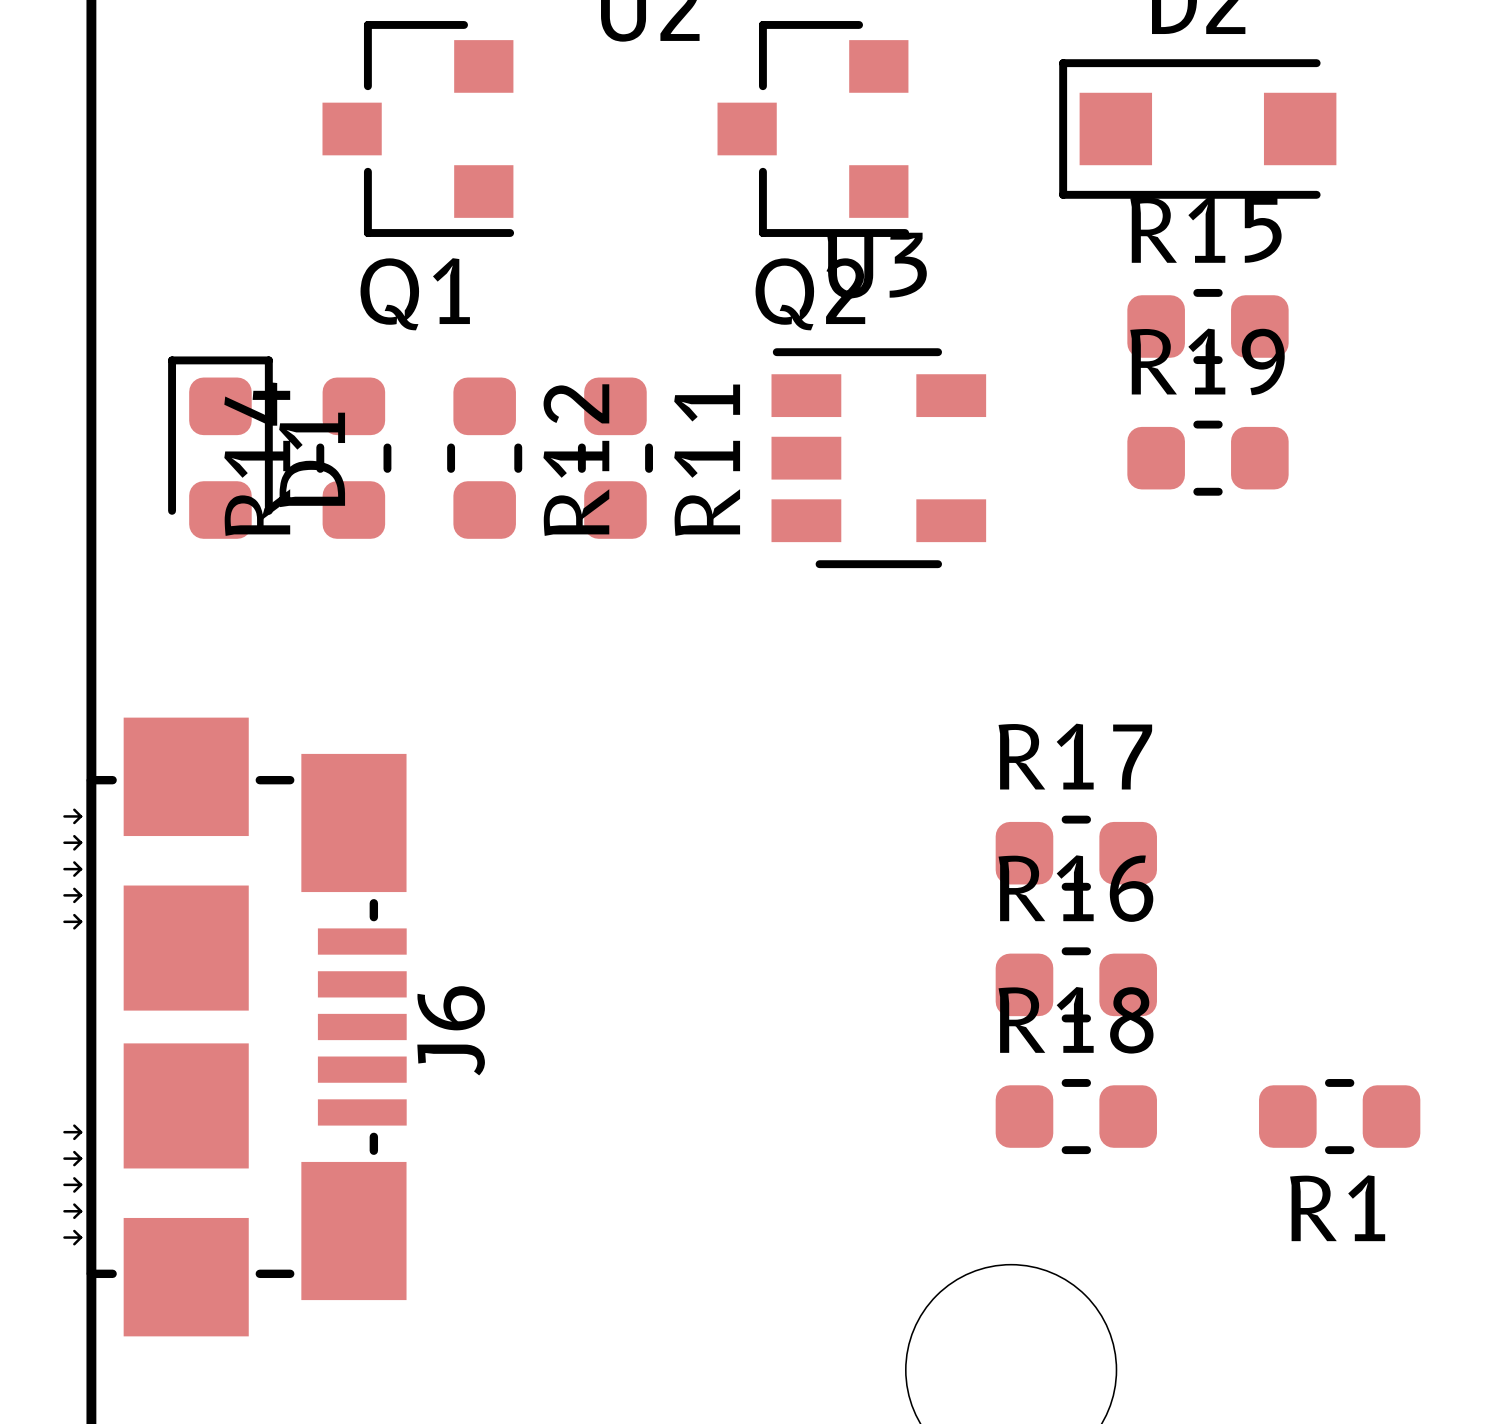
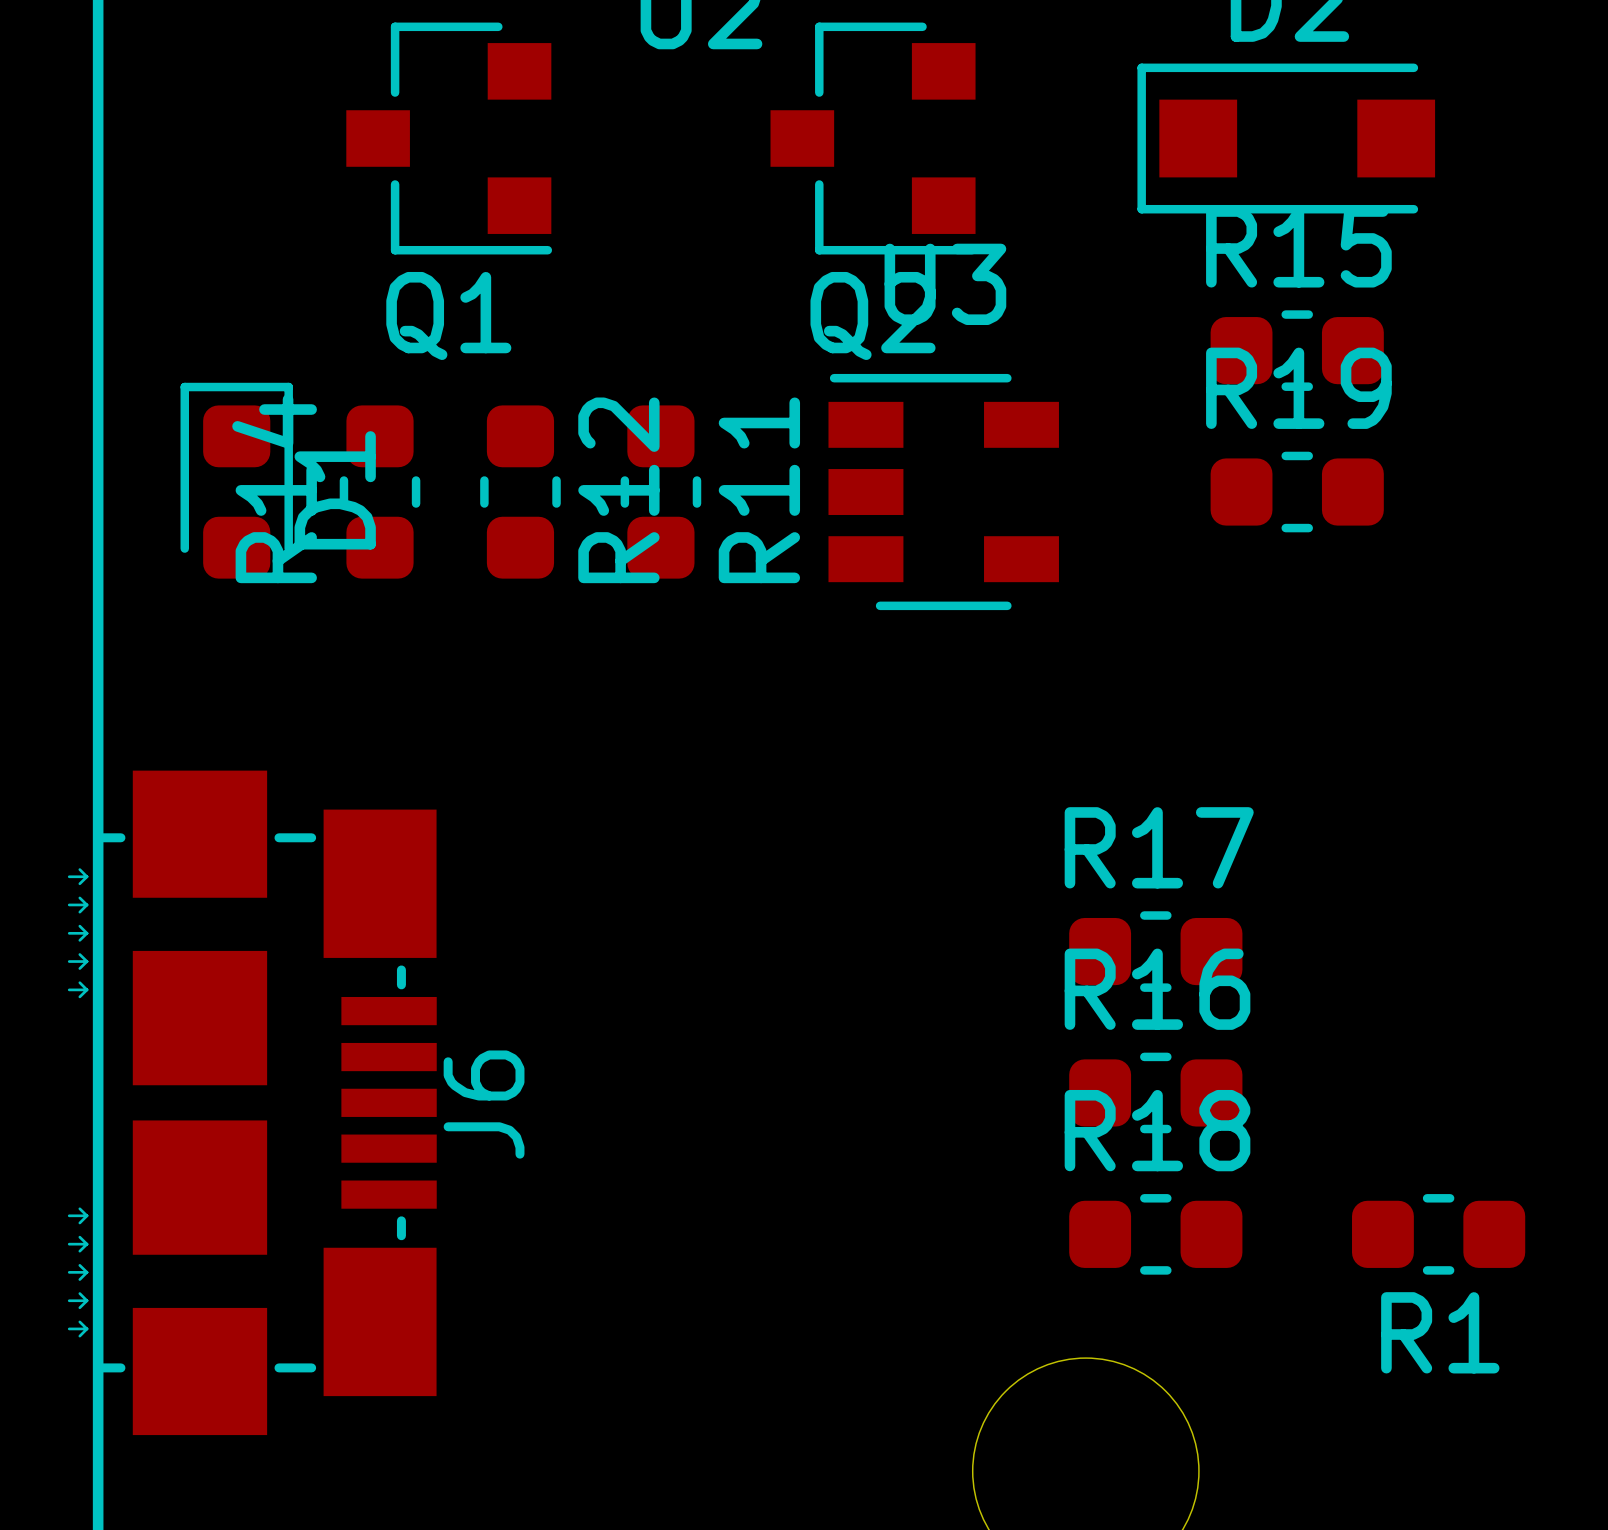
R17 position: (1076, 853) -> (1155, 951)
R16 position: (1076, 984) -> (1155, 1092)
R18 position: (1076, 1116) -> (1155, 1234)
R1 position: (1339, 1116) -> (1438, 1234)

